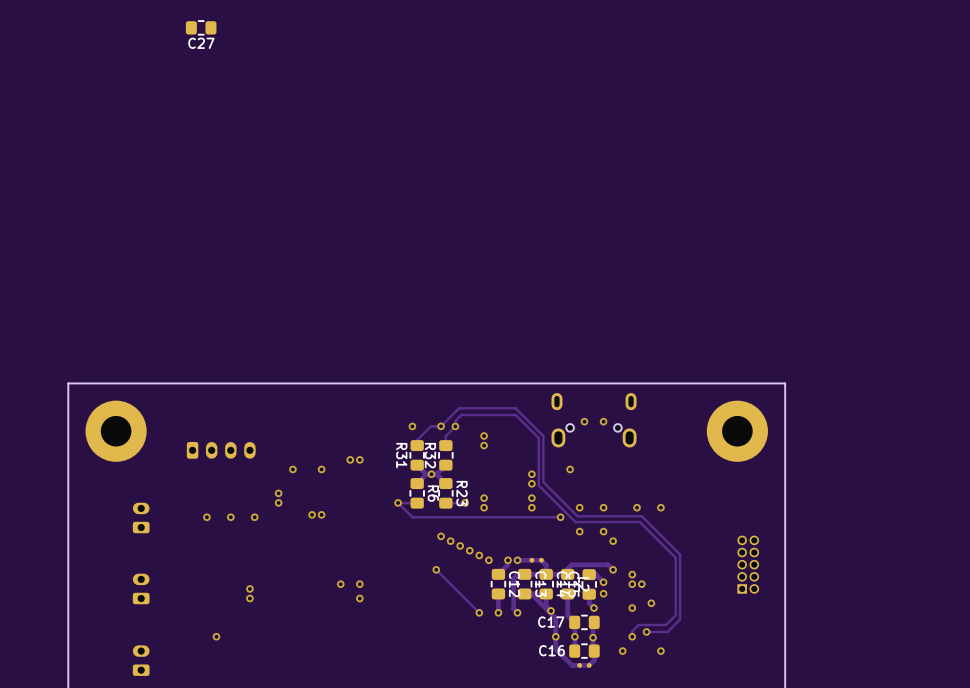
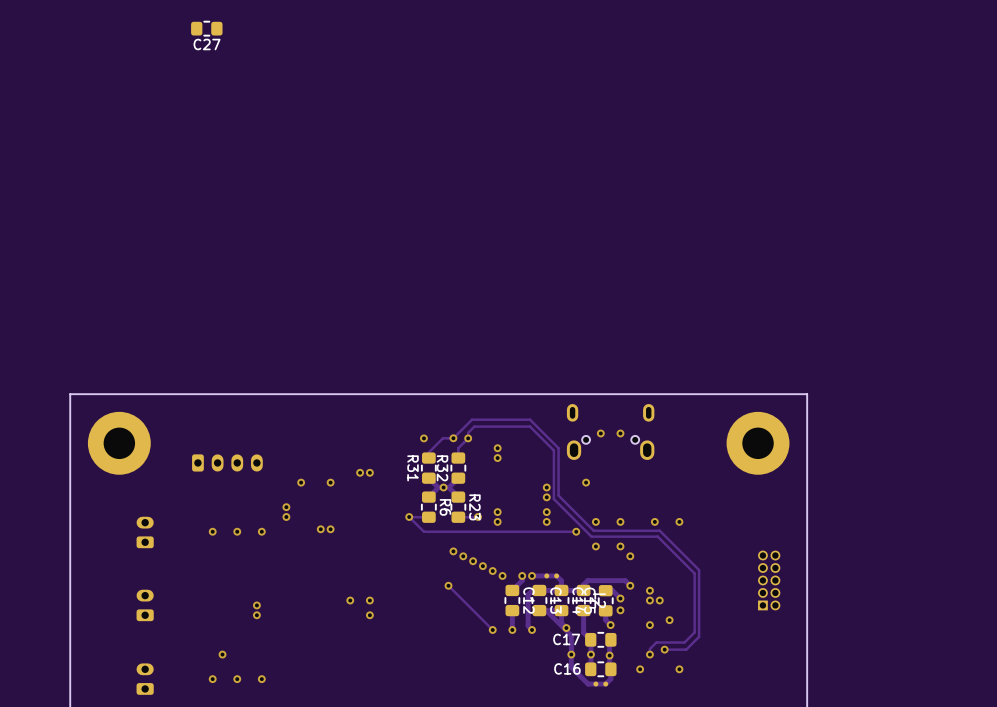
via: none -> (212, 679)
via: none -> (237, 679)
via: none -> (261, 679)

